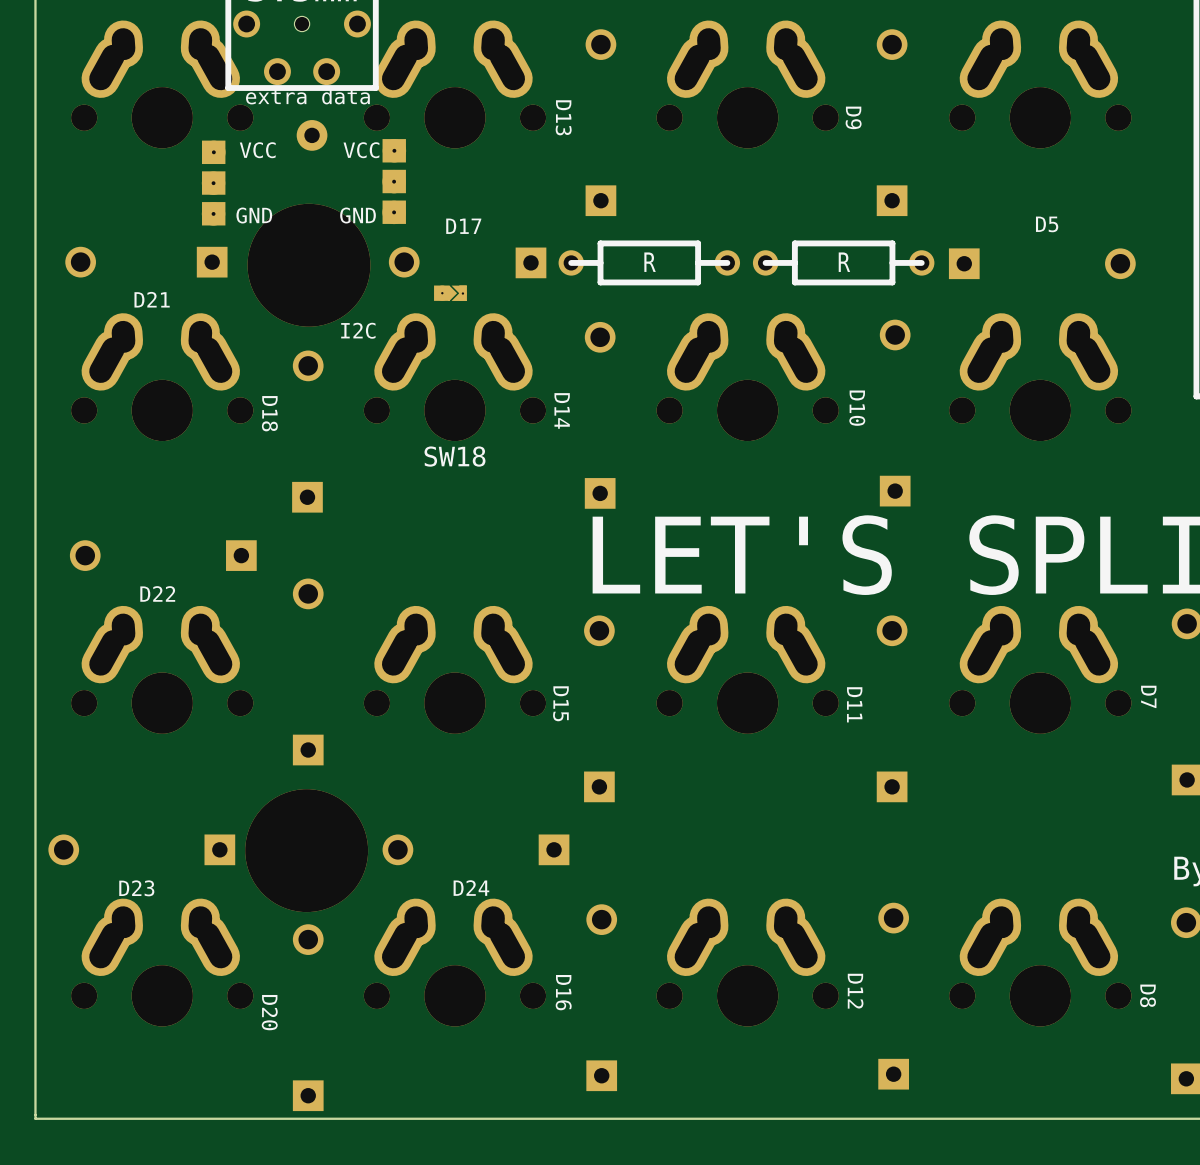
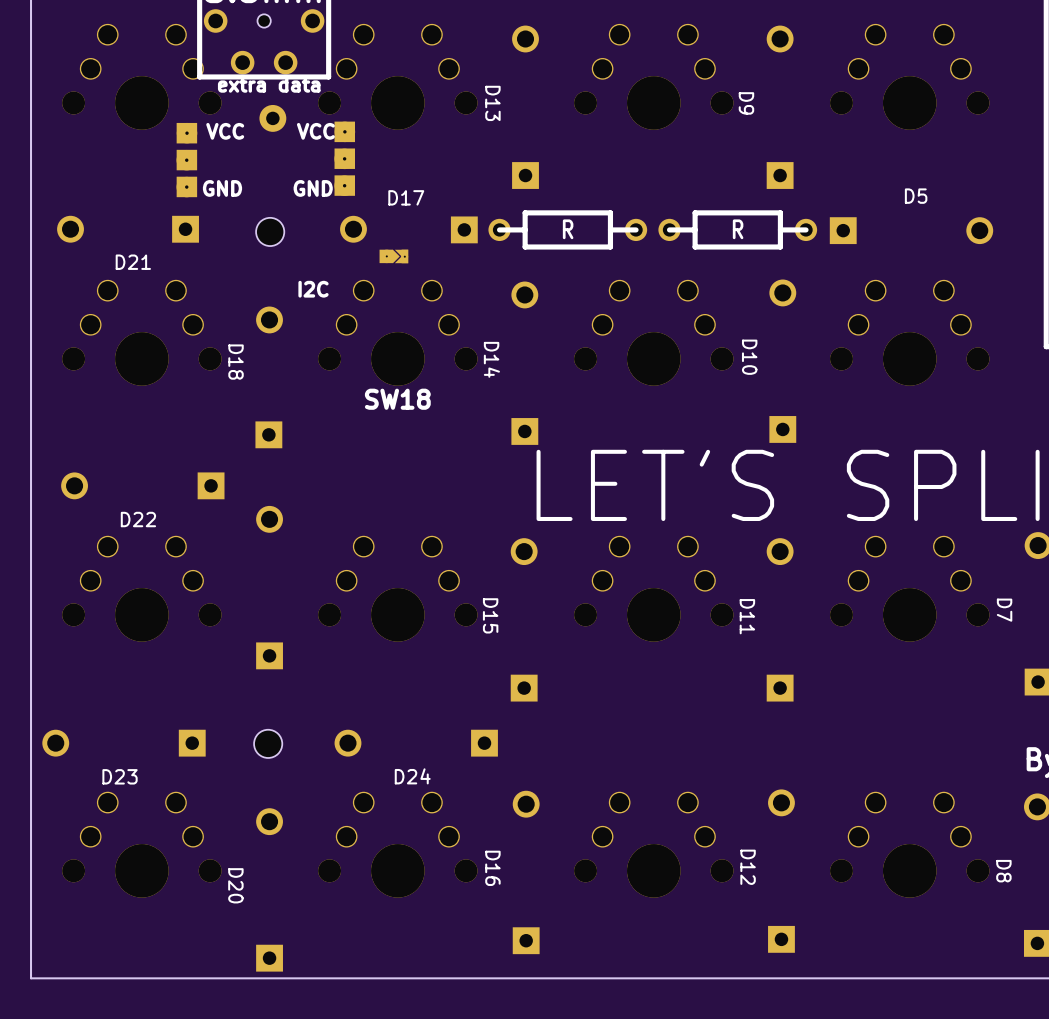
part footprint: [71, 20, 254, 149] -> [62, 23, 222, 130]
part footprint: [363, 20, 547, 149] -> [318, 23, 478, 130]
part footprint: [656, 20, 839, 149] -> [574, 23, 734, 130]
part footprint: [949, 20, 1132, 149] -> [830, 23, 990, 130]
part footprint: [247, 203, 371, 327] -> [256, 217, 285, 247]
part footprint: [71, 313, 254, 442] -> [62, 279, 222, 386]
SW18 footprint: [363, 313, 547, 442] -> [318, 279, 478, 386]
part footprint: [656, 313, 839, 442] -> [574, 279, 734, 386]
part footprint: [949, 313, 1132, 442] -> [830, 279, 990, 386]
part footprint: [71, 605, 254, 734] -> [62, 535, 222, 642]
part footprint: [363, 605, 547, 734] -> [318, 535, 478, 642]
part footprint: [656, 605, 839, 734] -> [574, 535, 734, 642]
part footprint: [949, 605, 1132, 734] -> [830, 535, 990, 642]
part footprint: [245, 789, 369, 913] -> [254, 729, 283, 758]
part footprint: [71, 898, 254, 1027] -> [62, 791, 222, 898]
part footprint: [363, 898, 547, 1027] -> [318, 791, 478, 898]
part footprint: [656, 898, 839, 1027] -> [574, 791, 734, 898]
part footprint: [949, 898, 1132, 1027] -> [830, 791, 990, 898]

